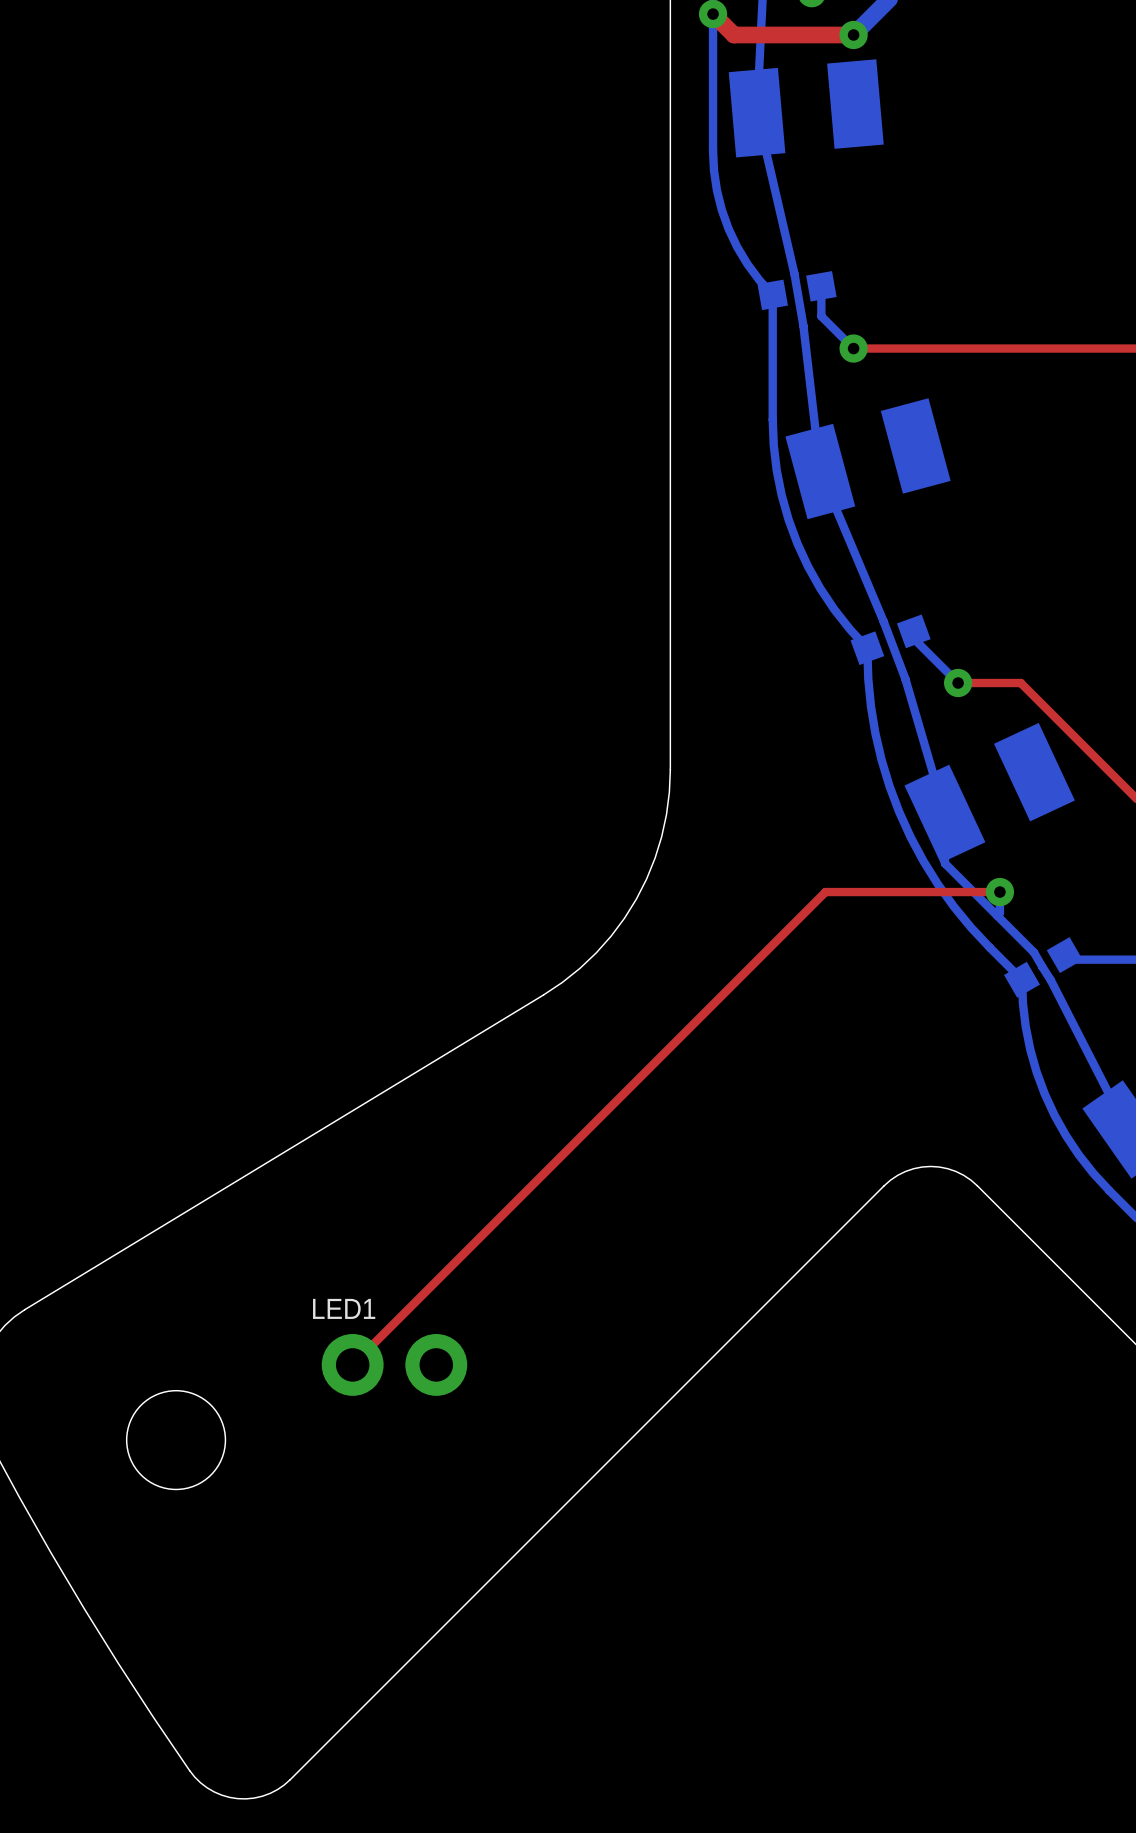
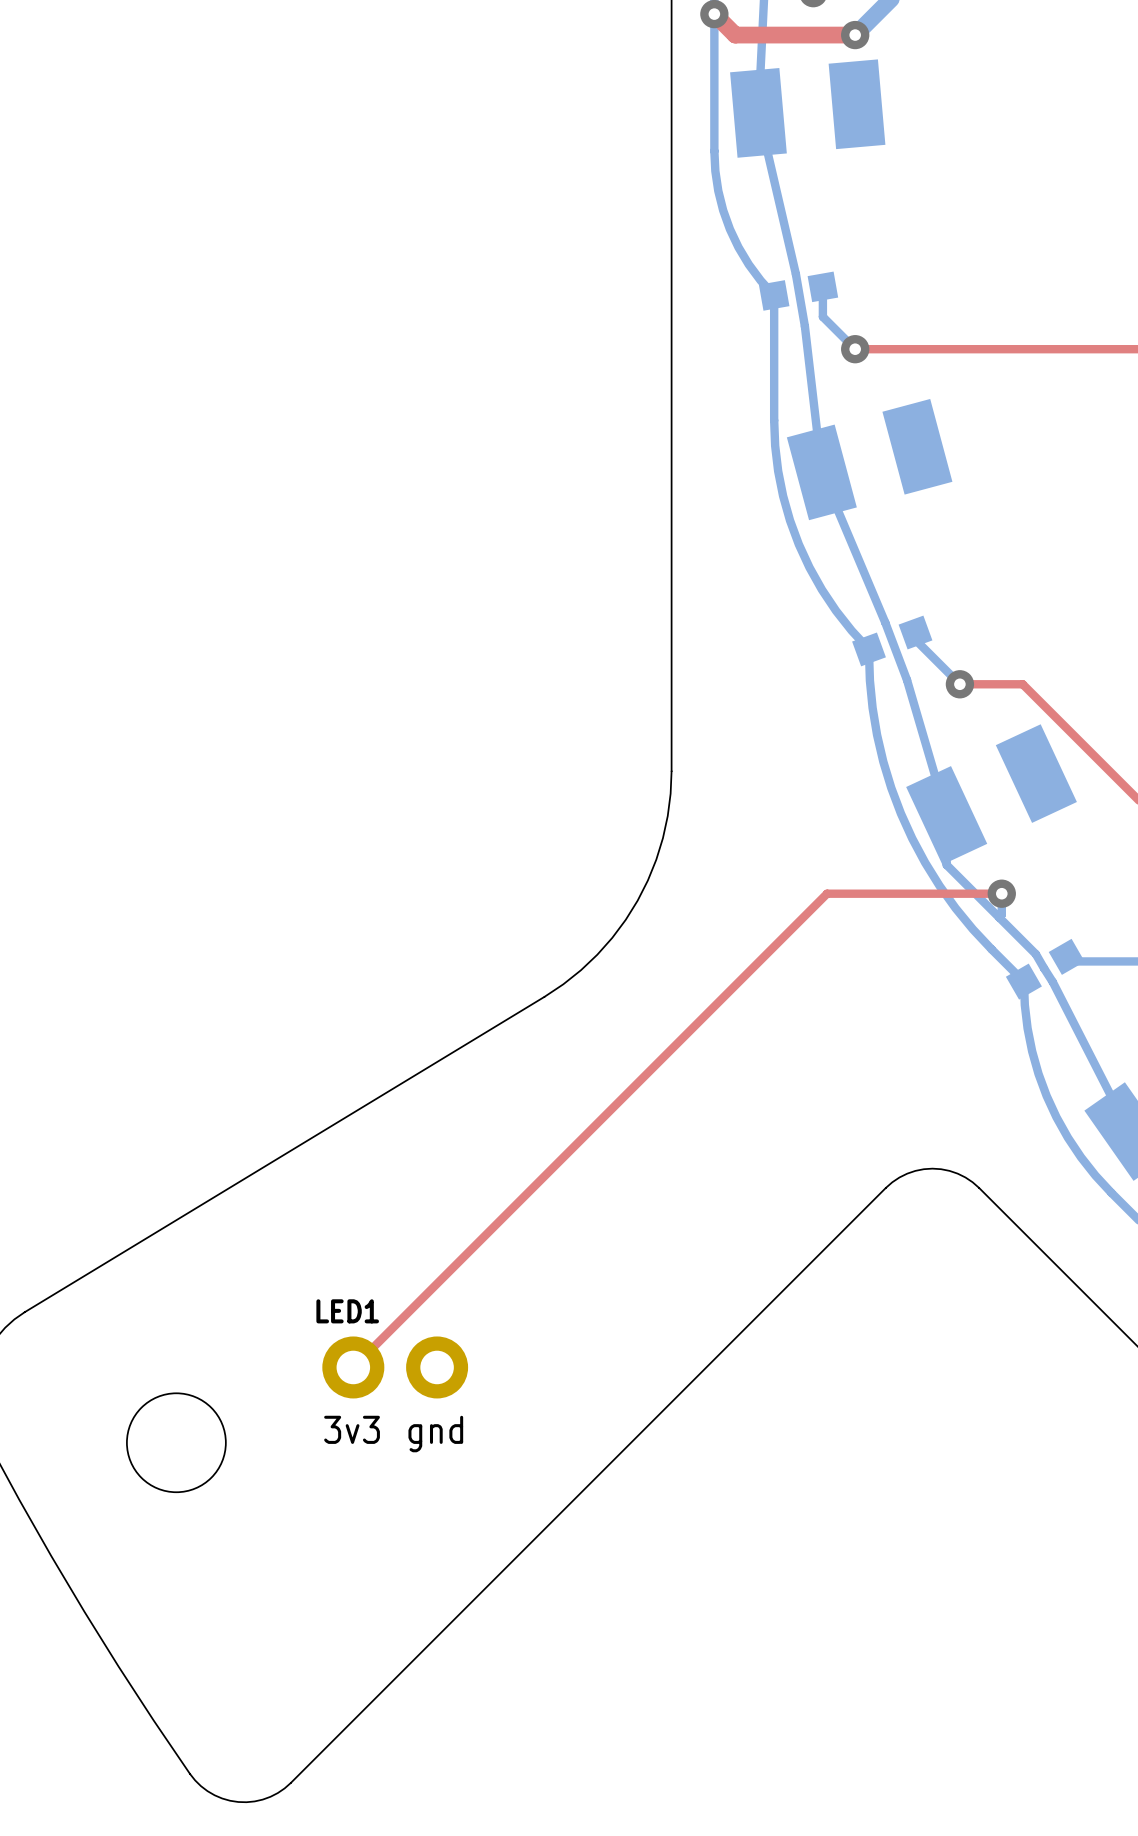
text: none -> 3v3 (352, 1429)
text: none -> gnd (435, 1434)

